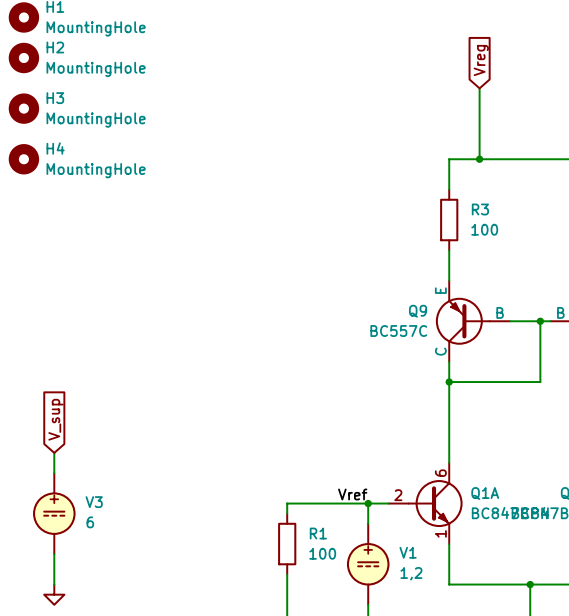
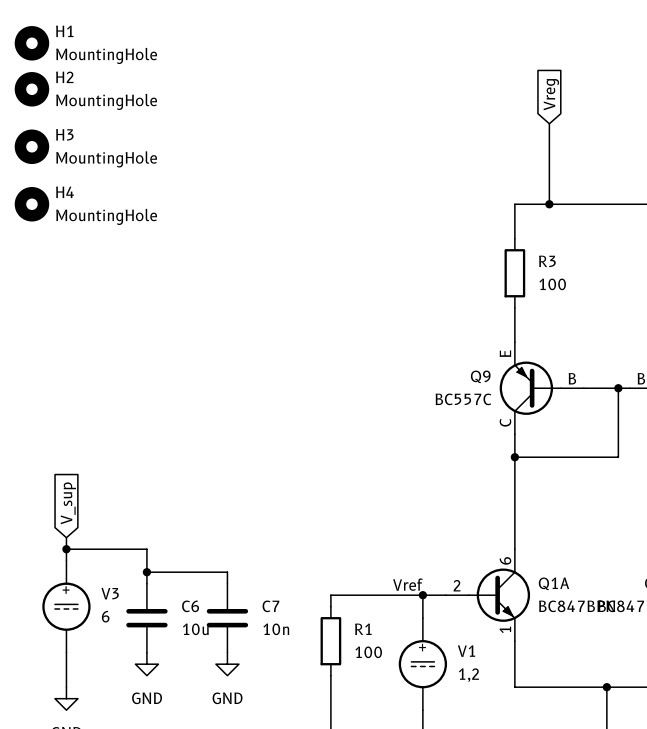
wire: none -> (66, 549) (146, 549) (146, 583)
junction: none -> (66, 549)
wire: none -> (146, 572) (227, 572) (227, 583)
junction: none -> (146, 572)
C6: none -> 10u (146, 618)
C7: none -> 10n (227, 618)
power symbol: none -> GND (146, 664)
power symbol: none -> GND (227, 664)

